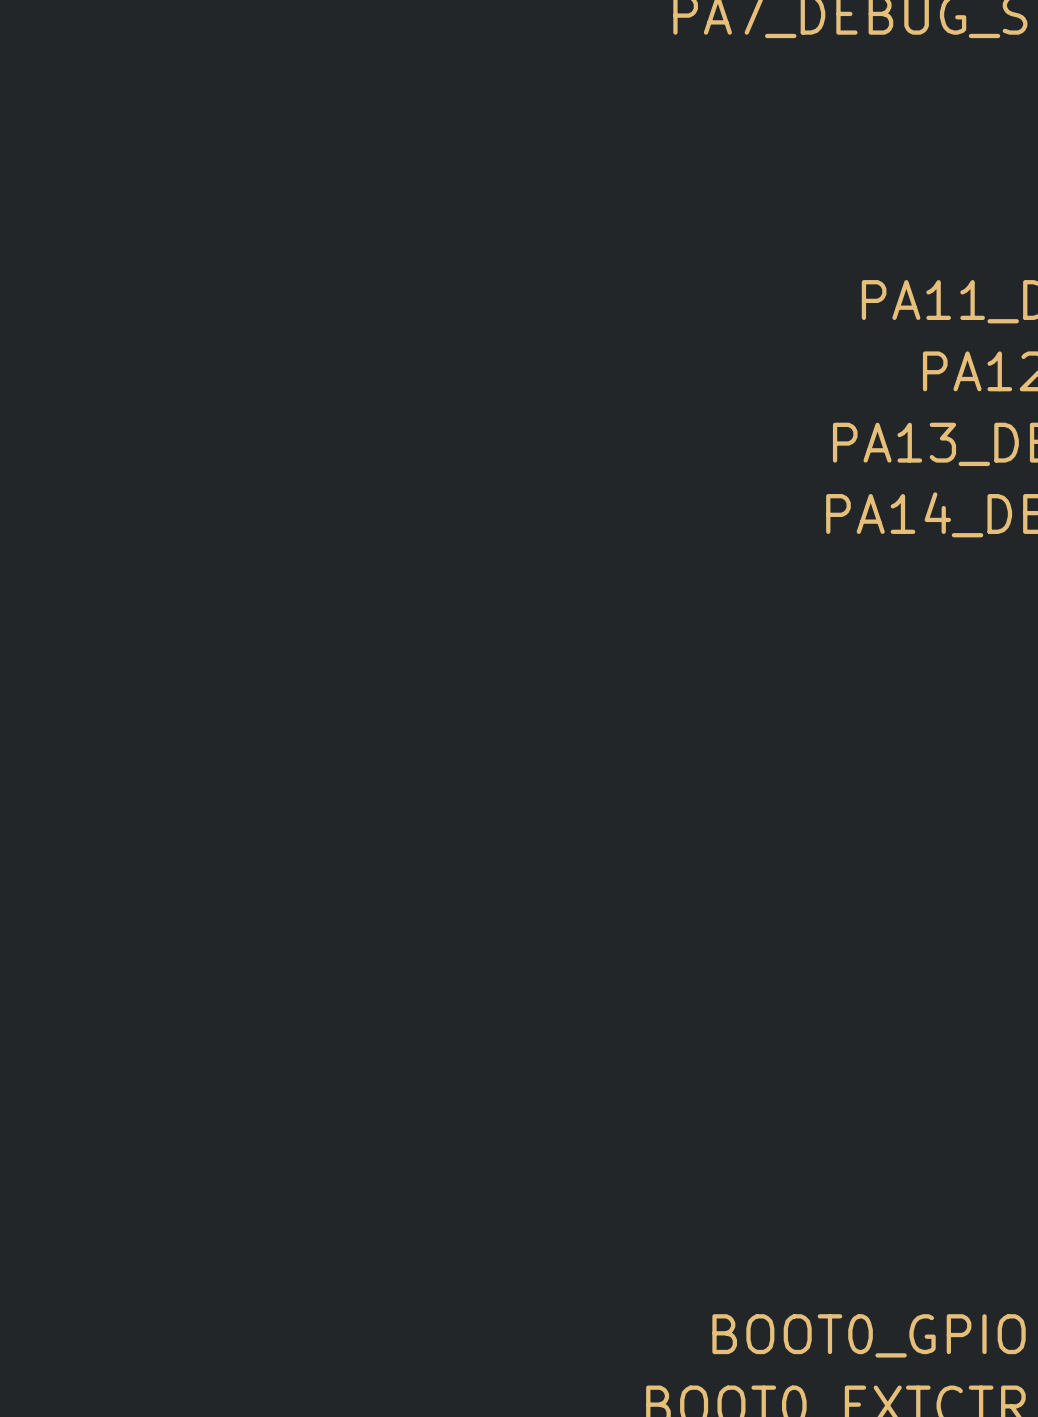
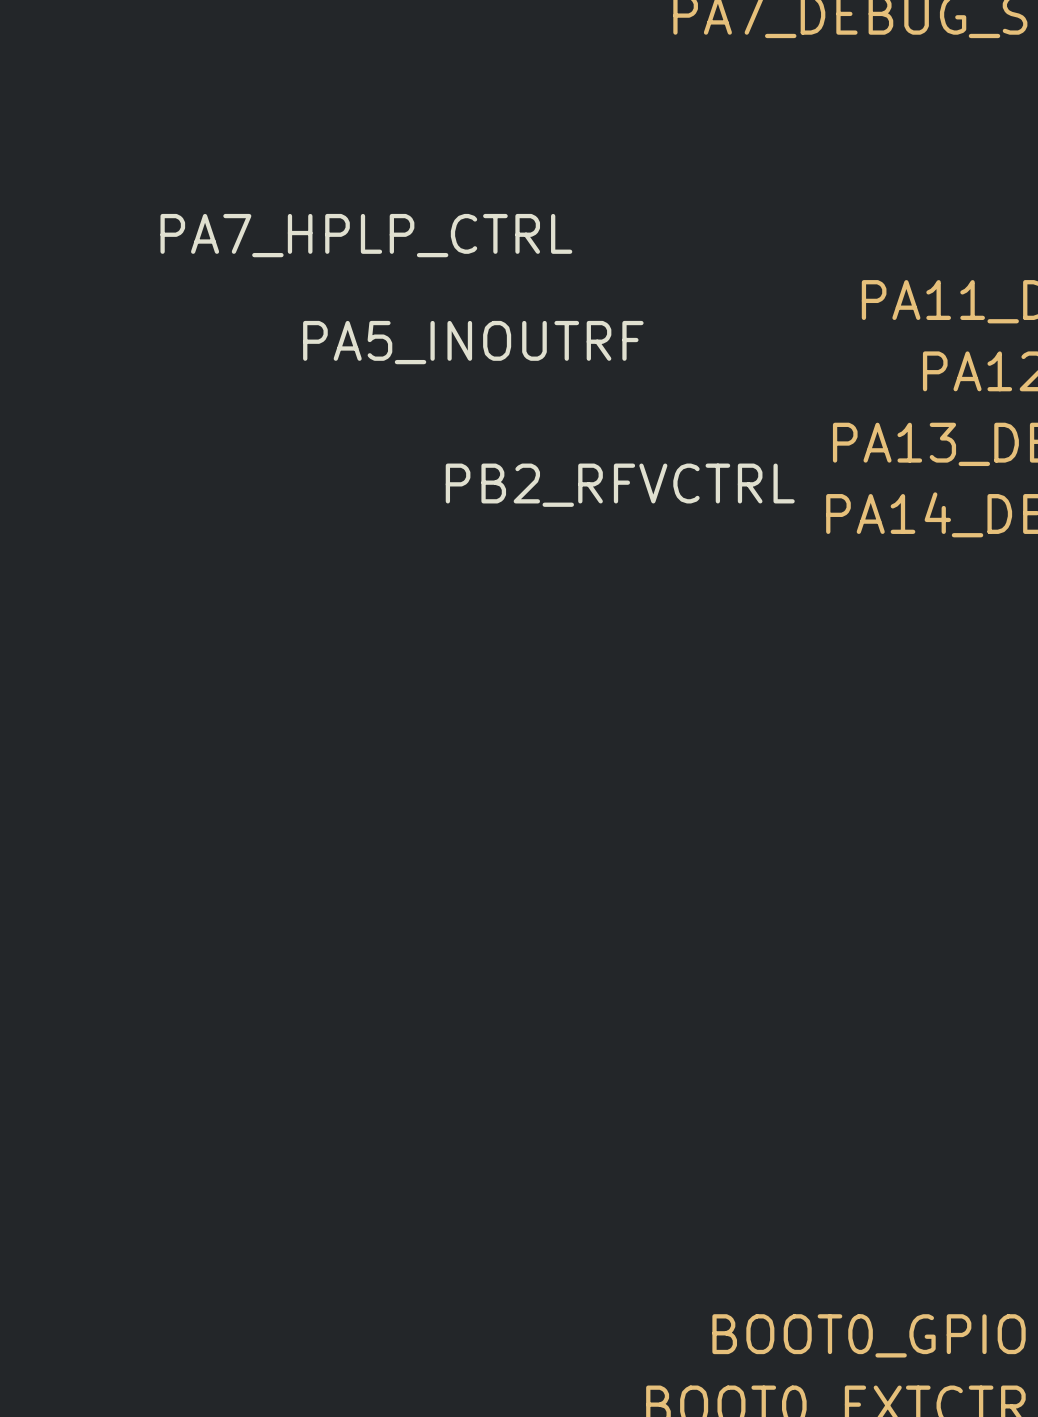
label: none -> PA7_HPLP_CTRL (366, 235)
label: none -> PA5_INOUTRF (473, 342)
label: none -> PB2_RFVCTRL (620, 485)

